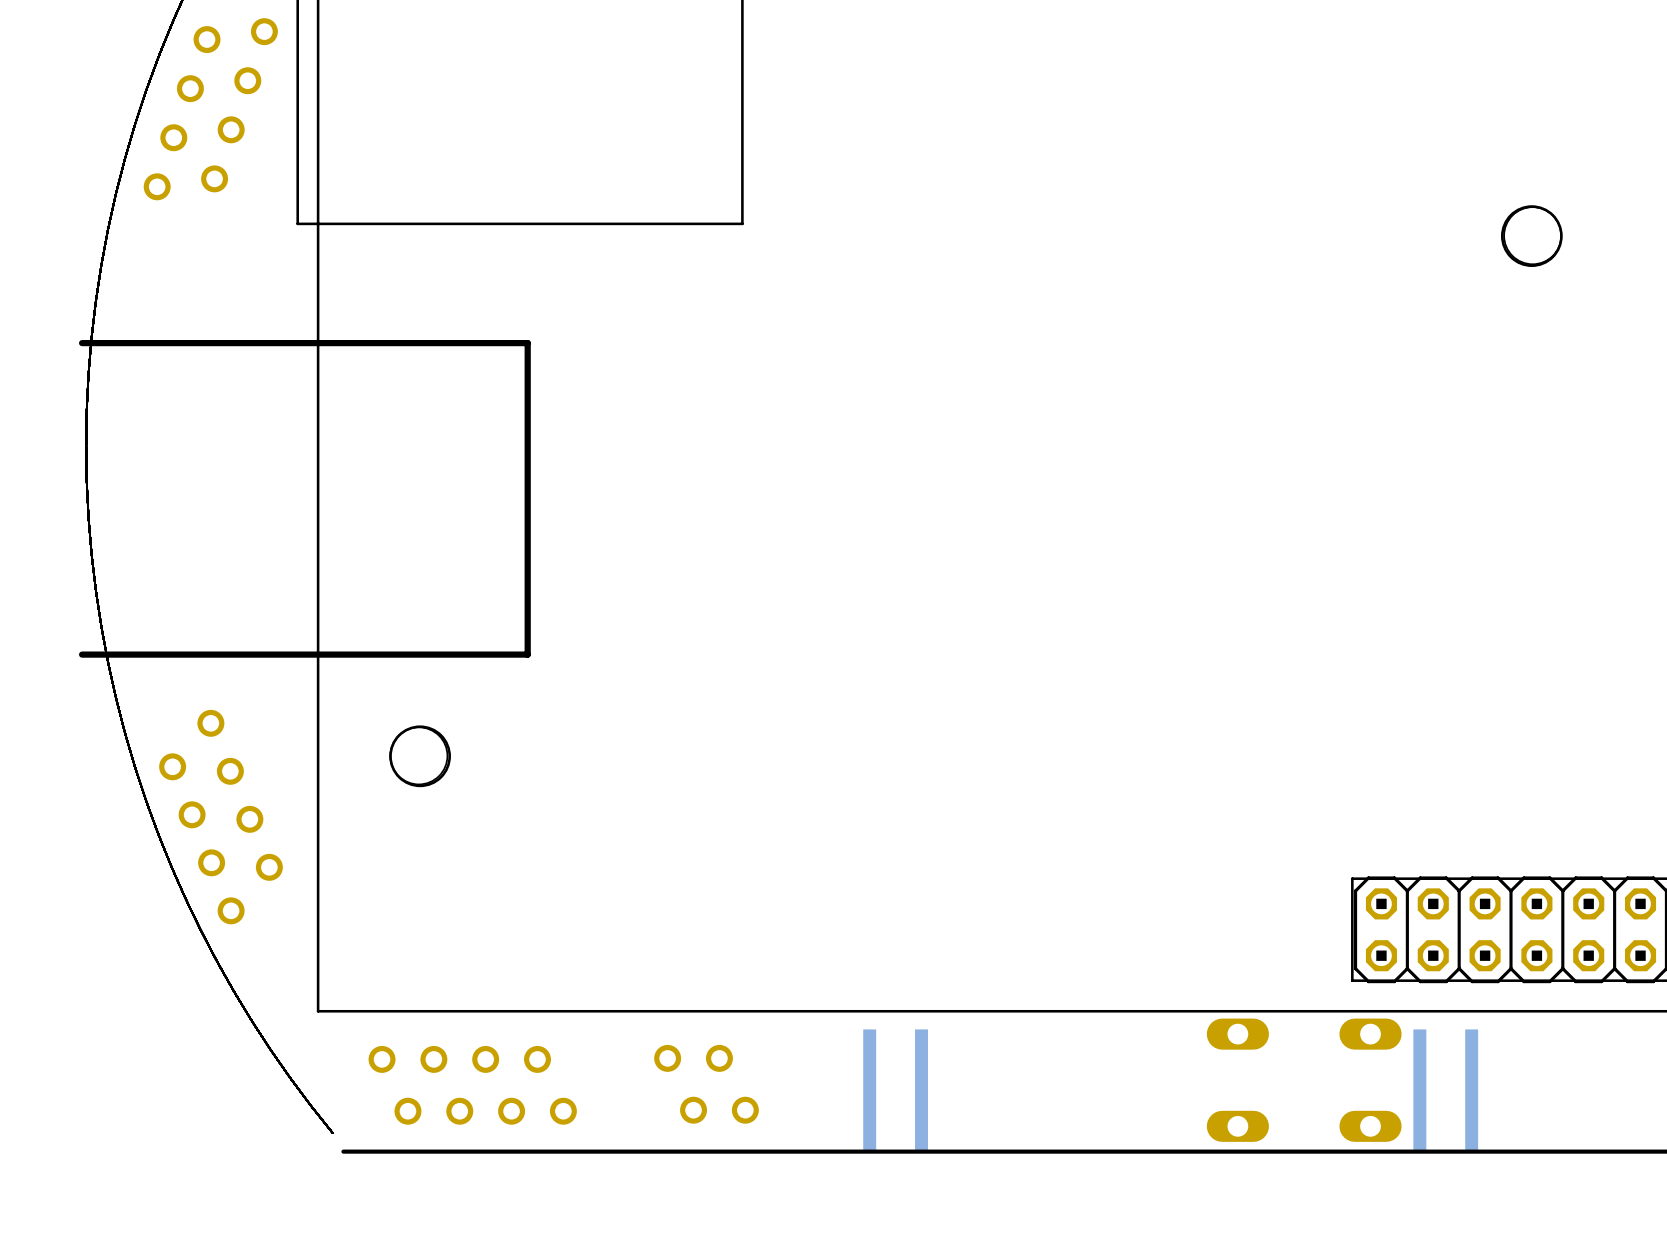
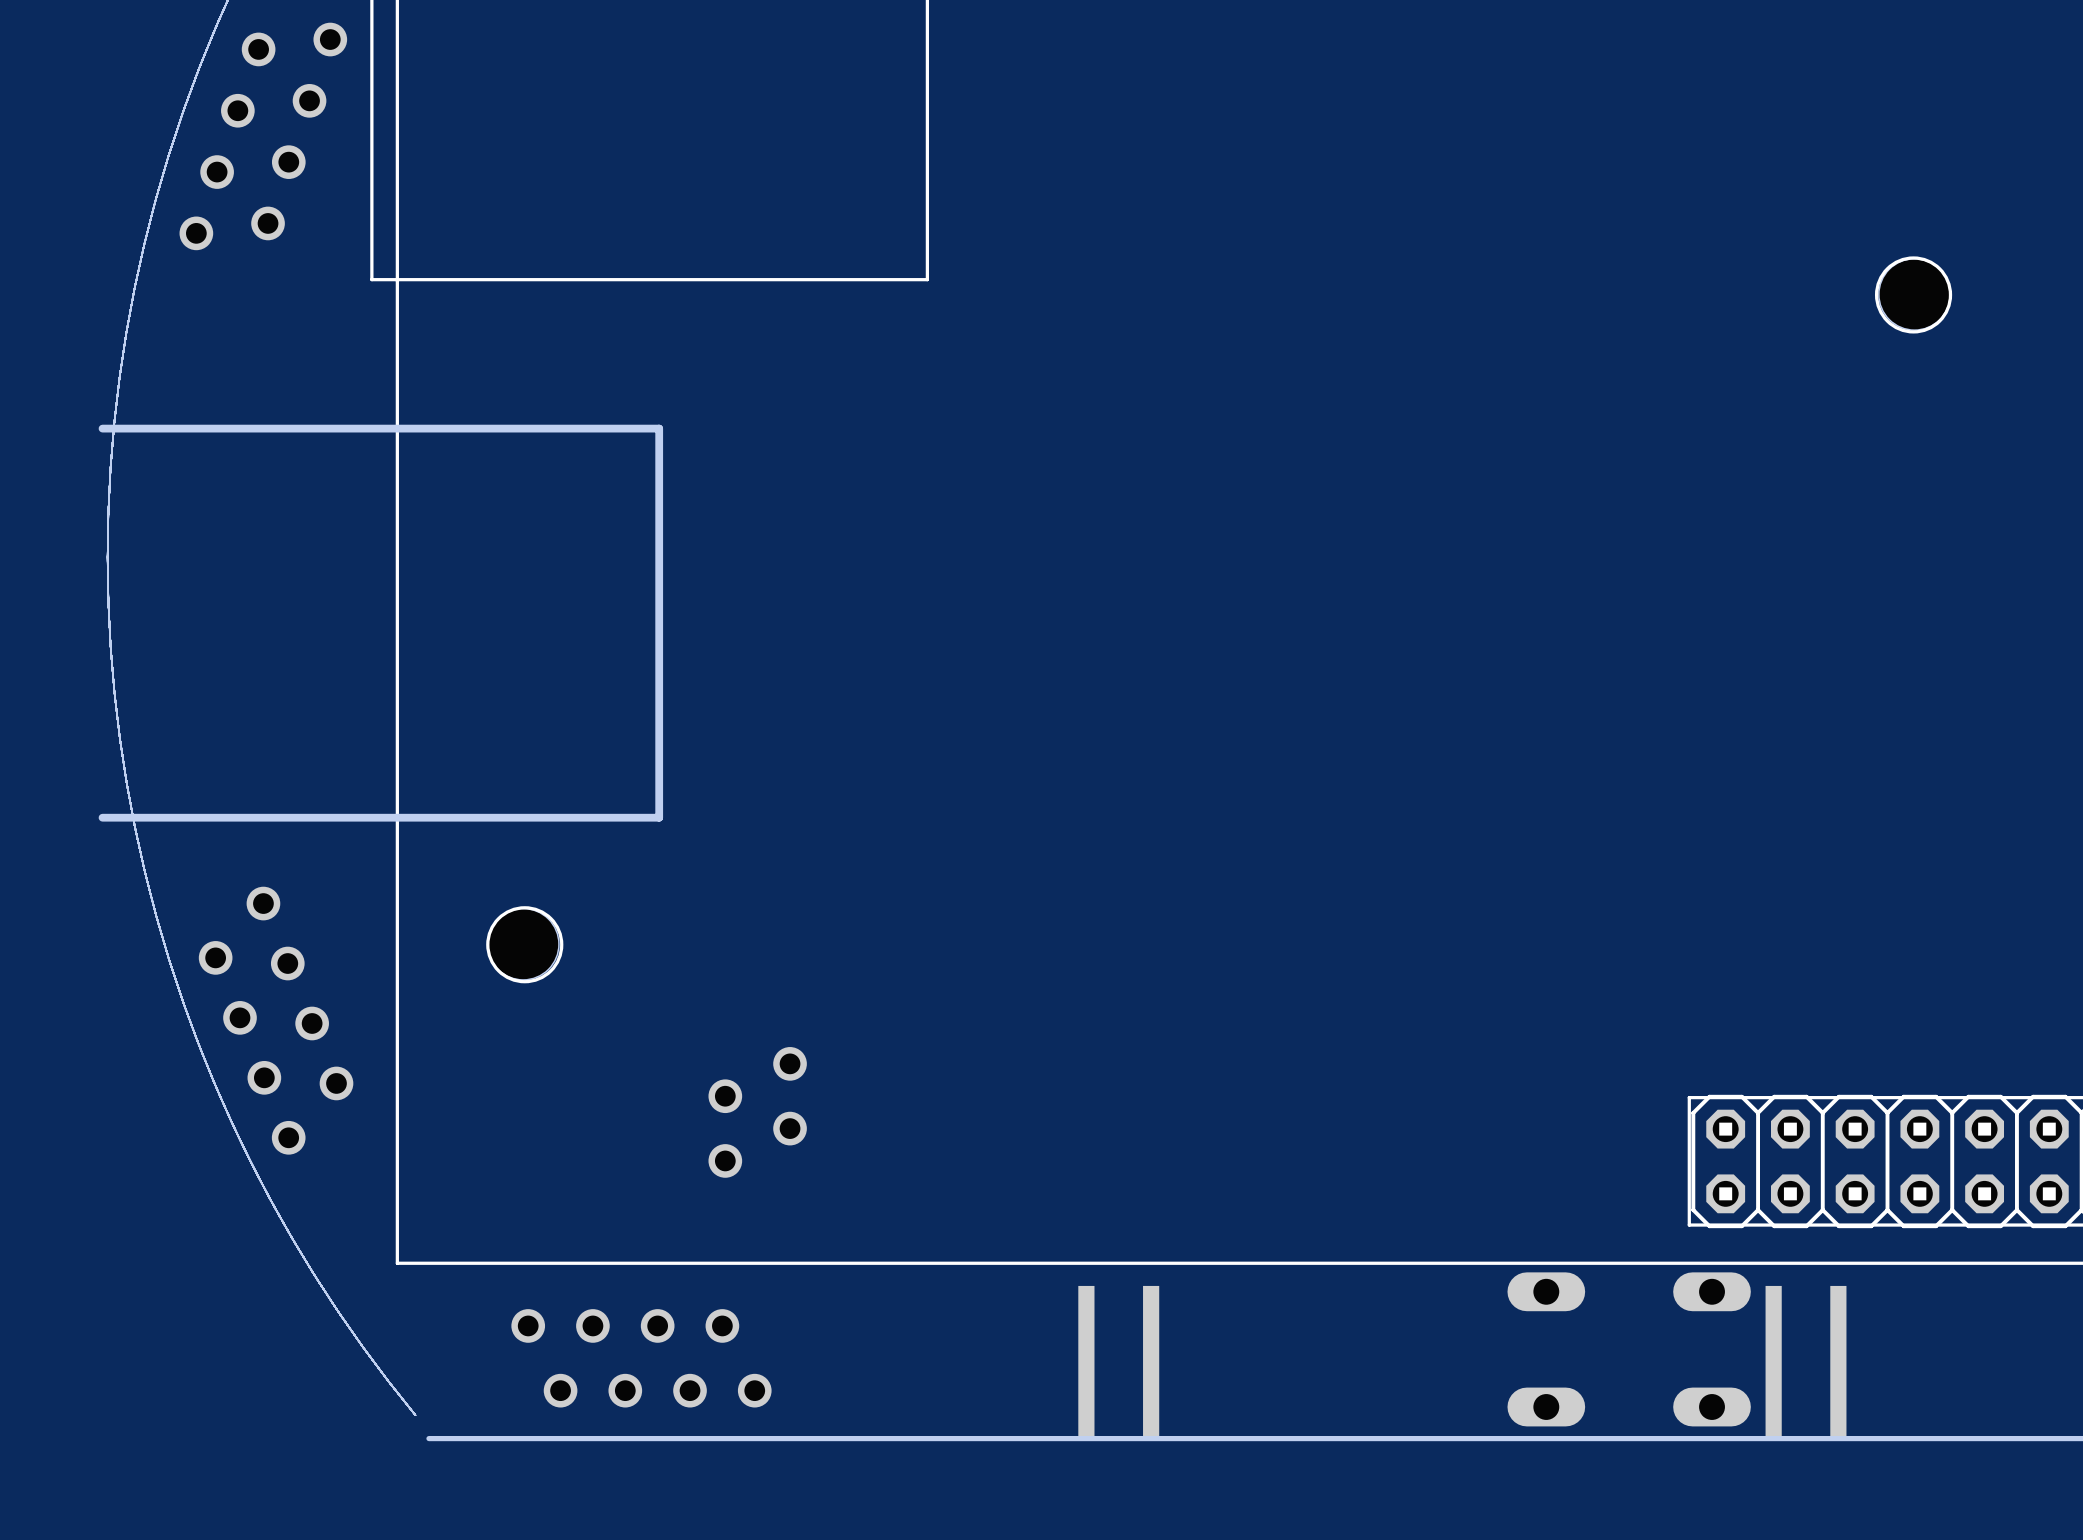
part rotation: 0° (706, 1084) -> 90° clockwise (757, 1112)
part position: (706, 1084) -> (757, 1112)
part position: (472, 1085) -> (641, 1358)

